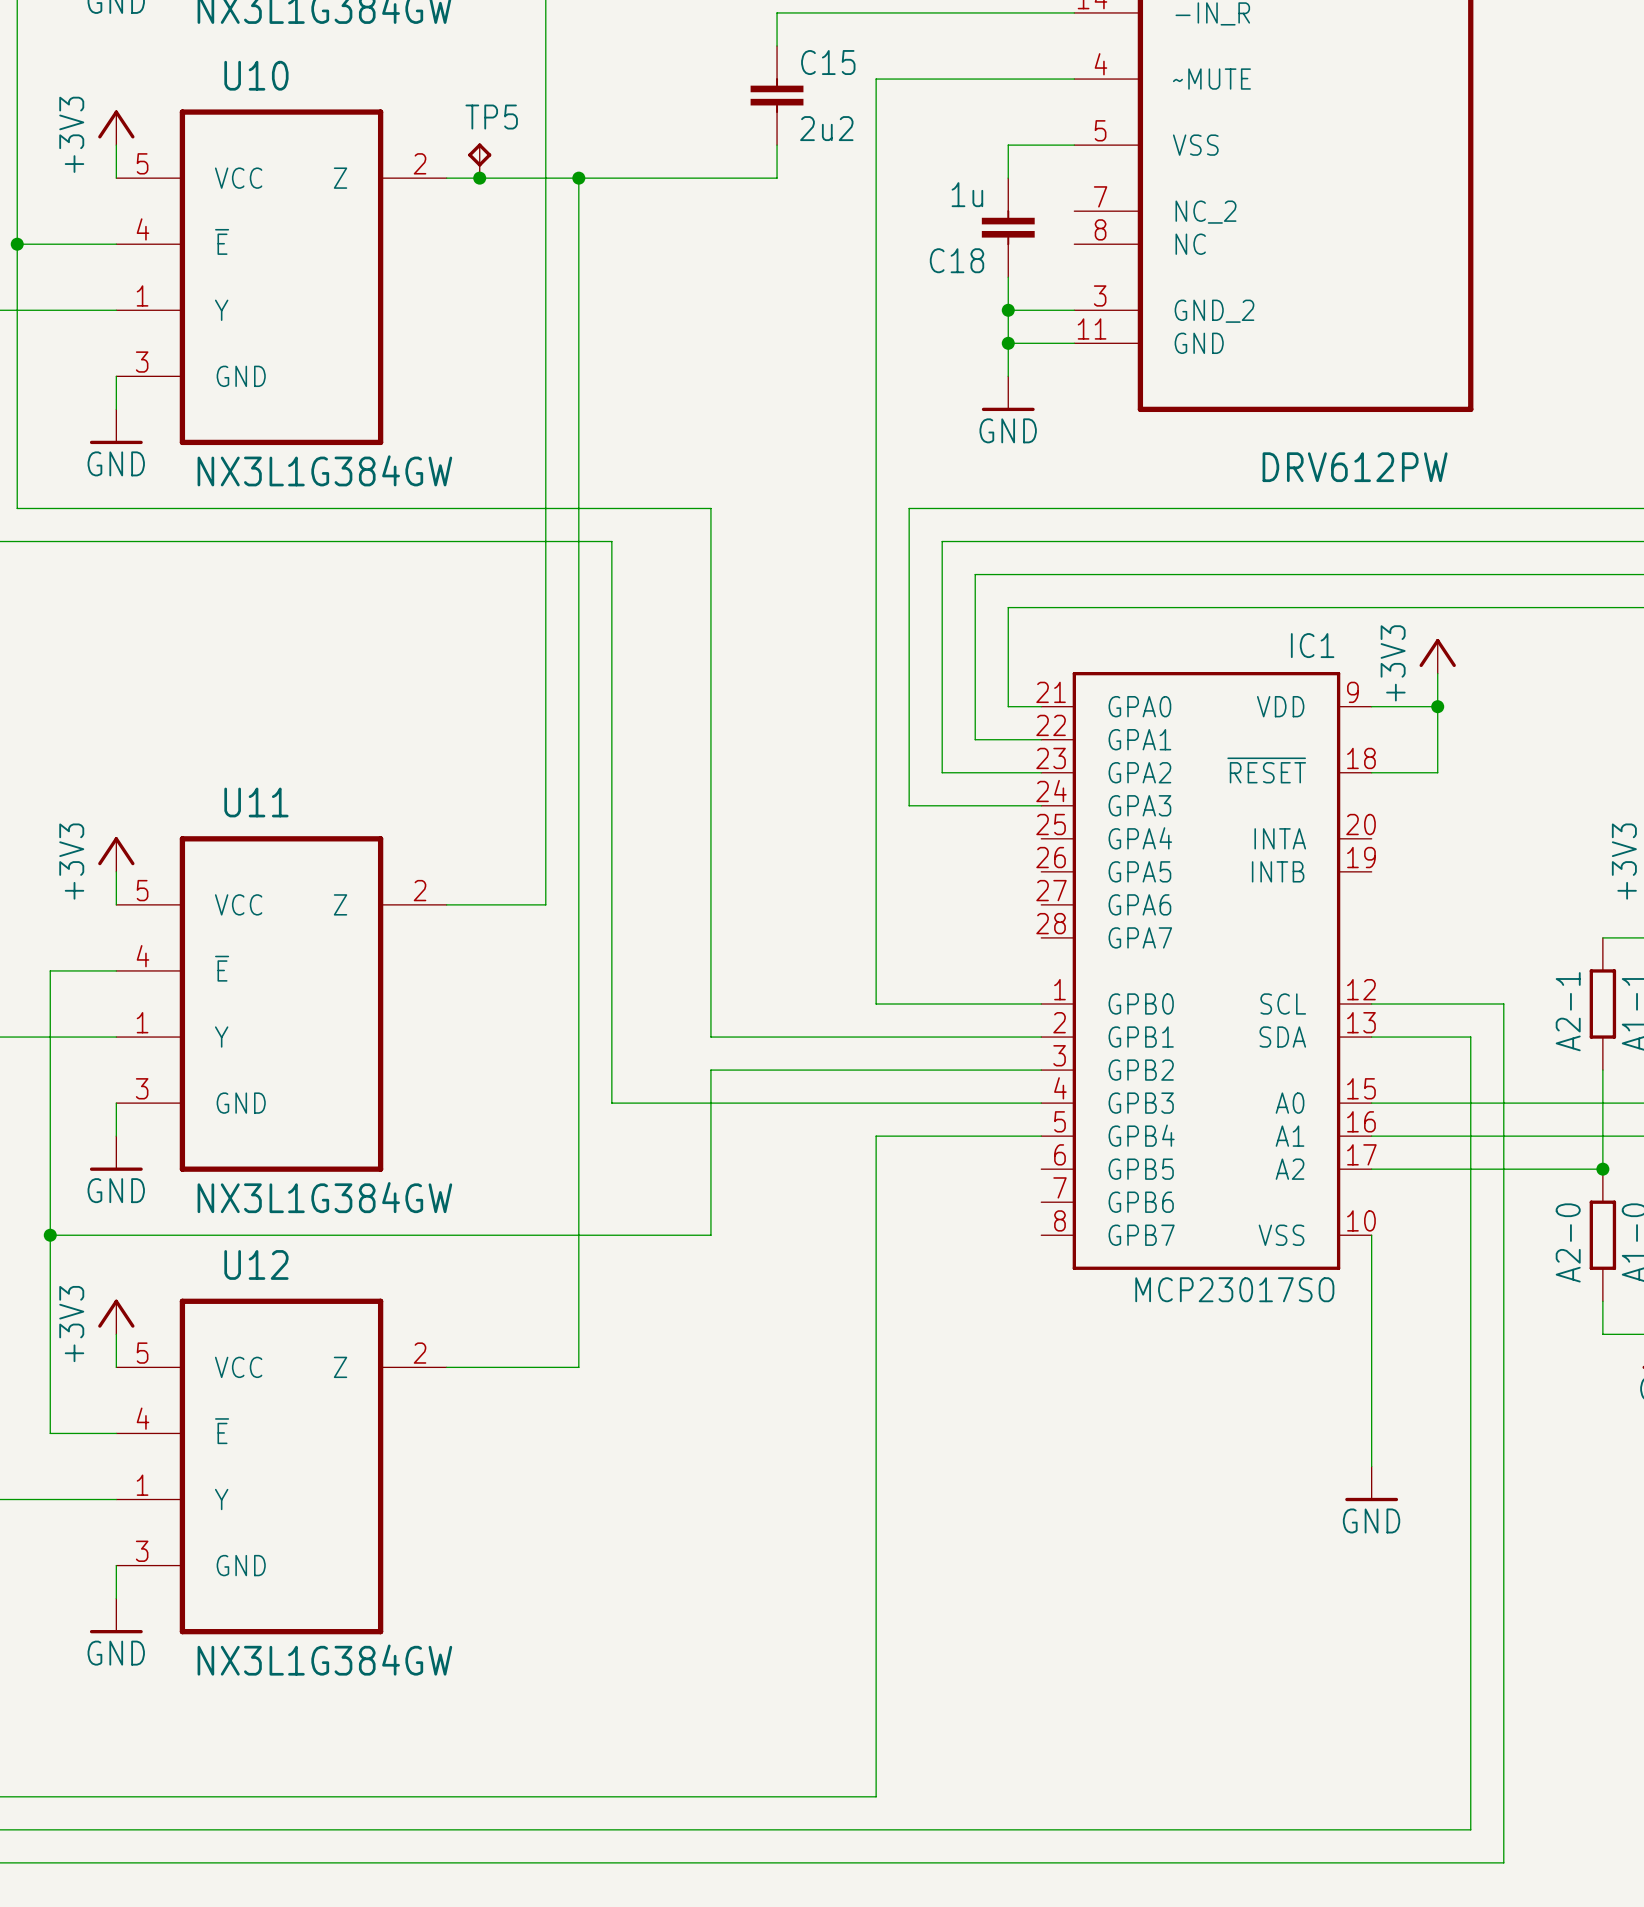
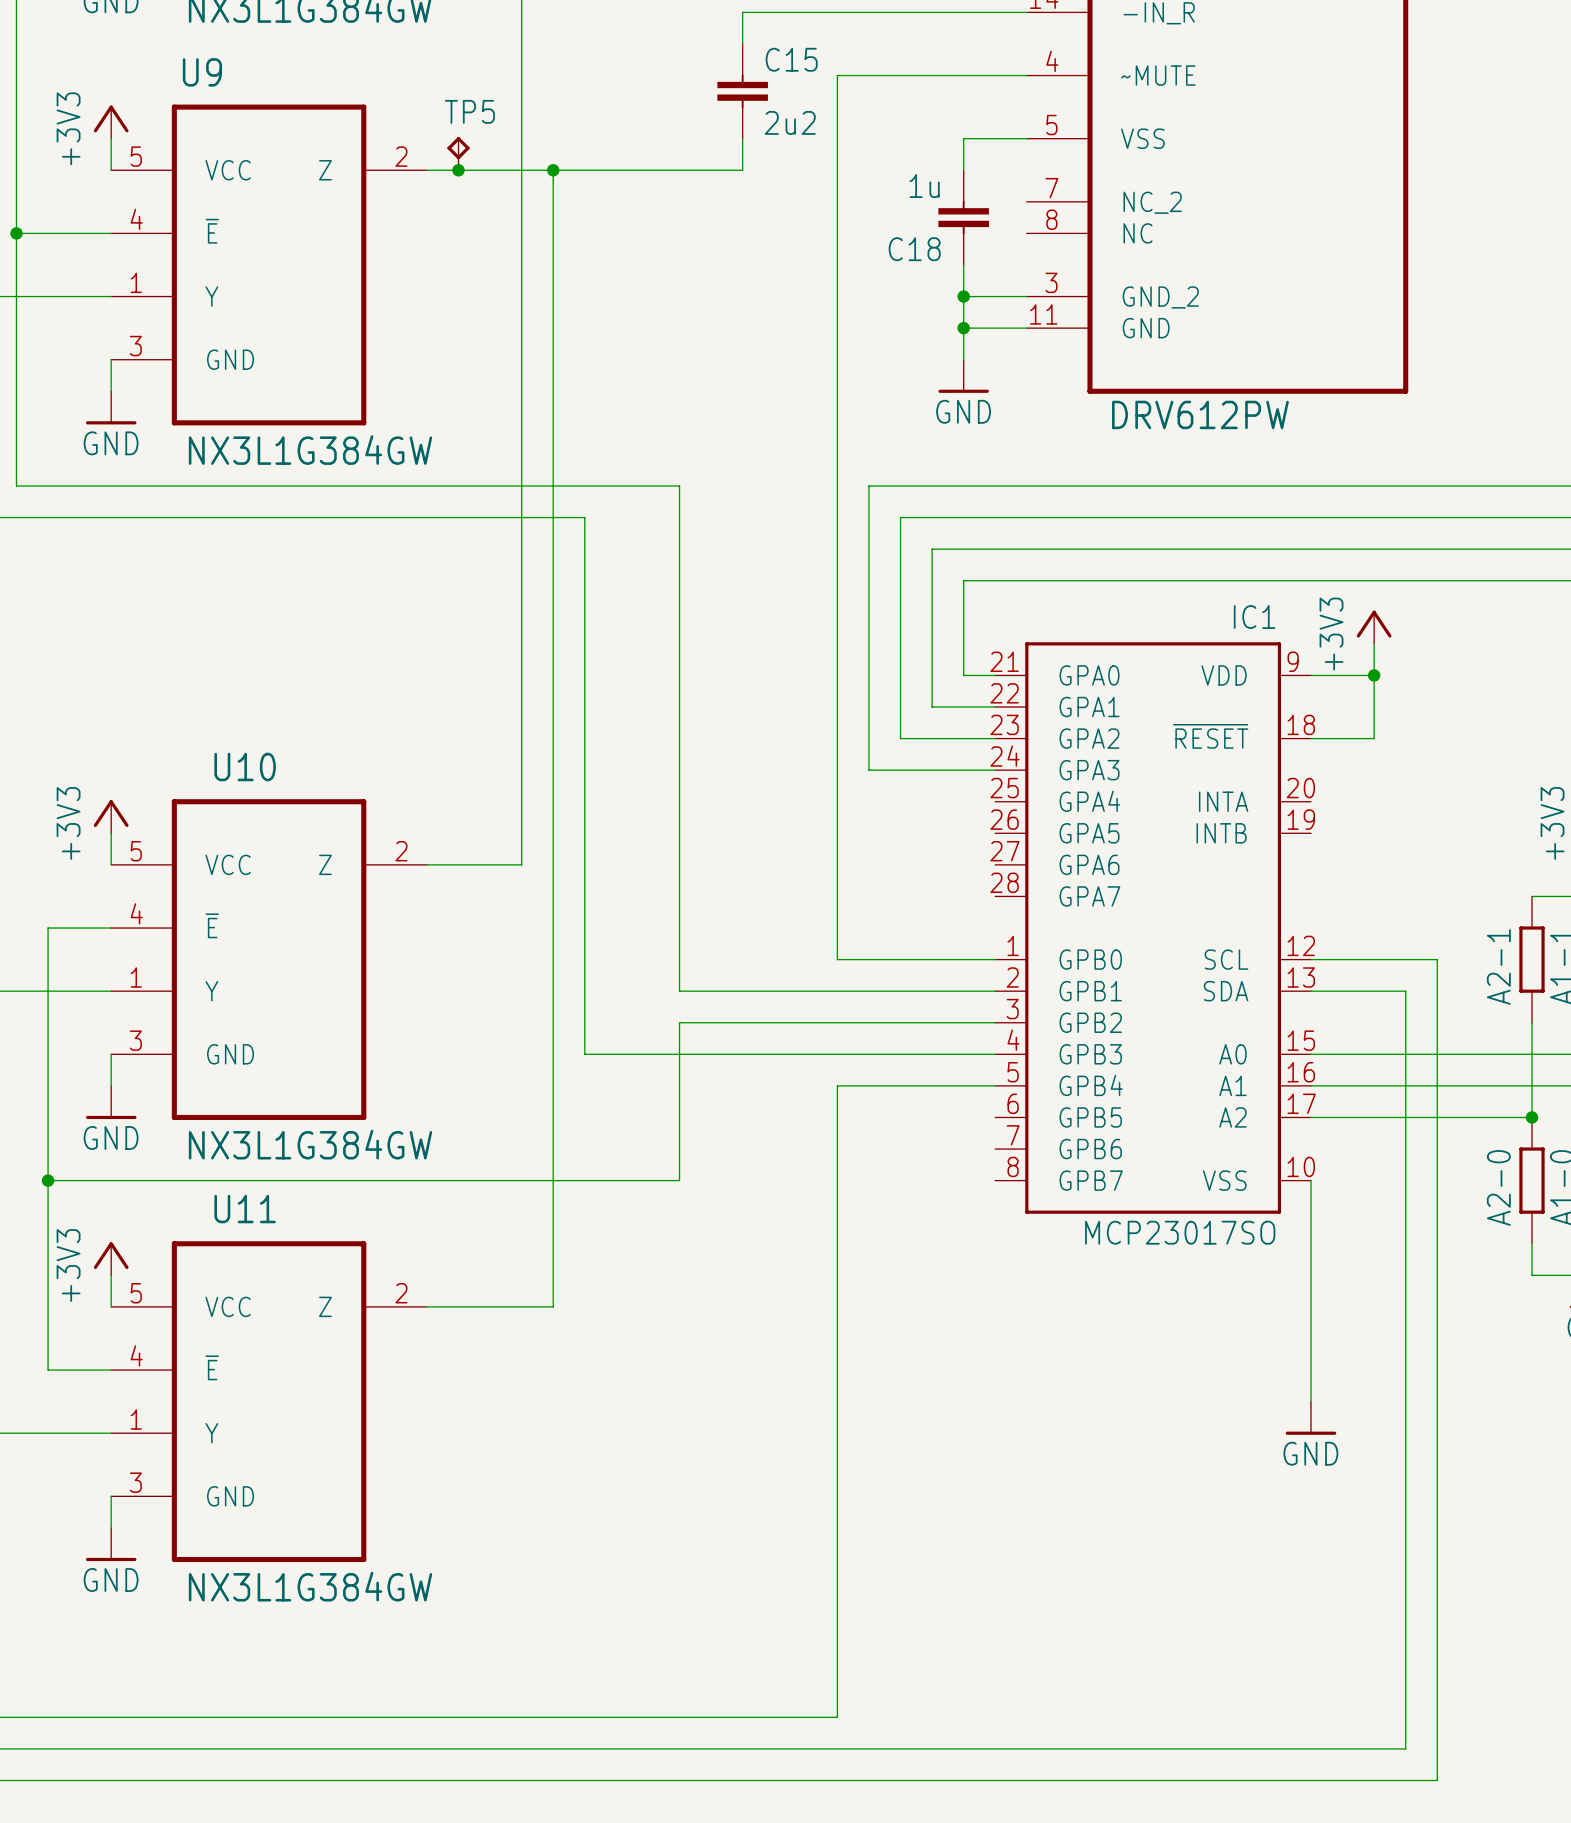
U10 name: U10 (256, 75) -> U9 (202, 72)
part value position: DRV612PW (1355, 467) -> DRV612PW (1200, 414)
U11 name: U11 (256, 802) -> U10 (245, 767)
U12 name: U12 (256, 1264) -> U11 (245, 1209)

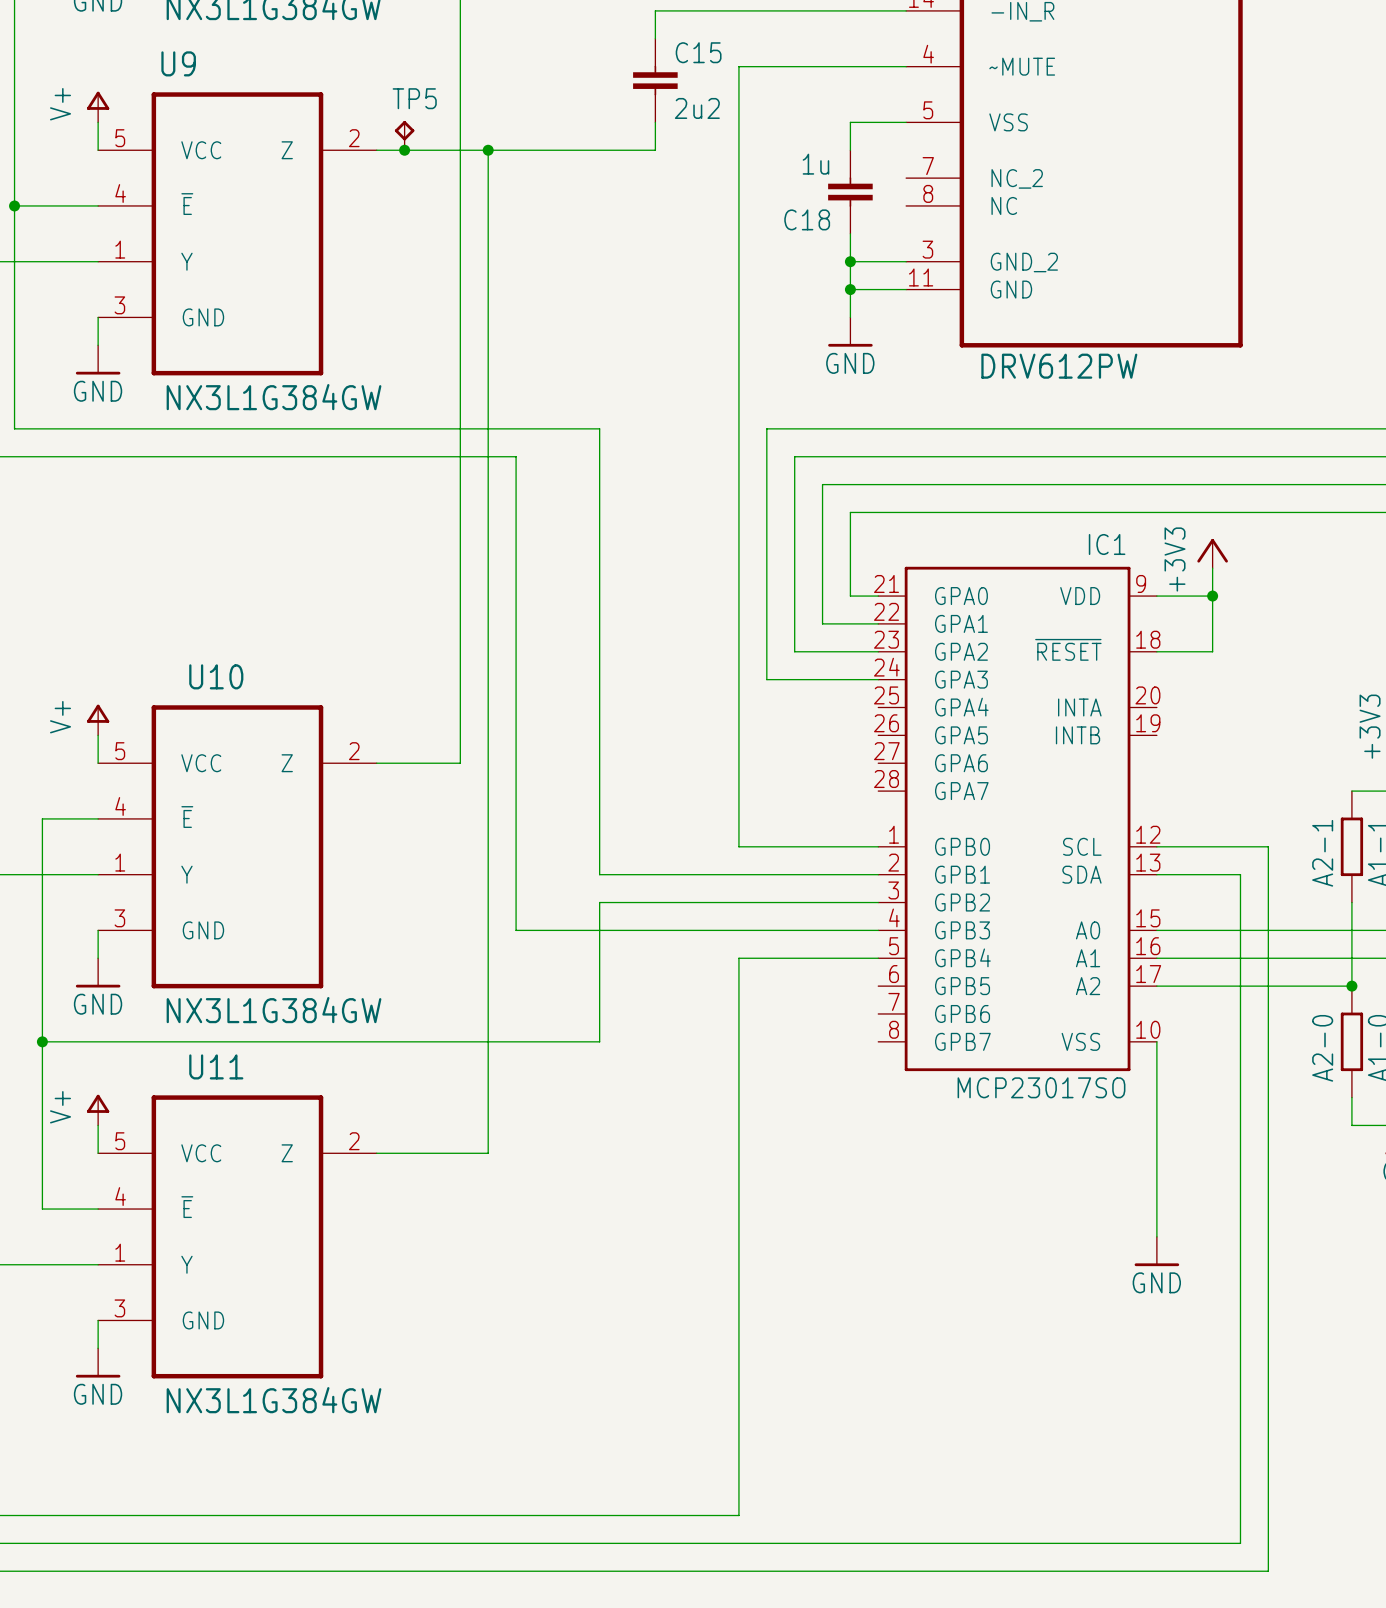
power symbol: +3V3 (111, 122) -> V+ (98, 107)
power symbol: +3V3 (111, 816) -> V+ (98, 720)
power symbol: +3V3 (111, 1258) -> V+ (98, 1110)

